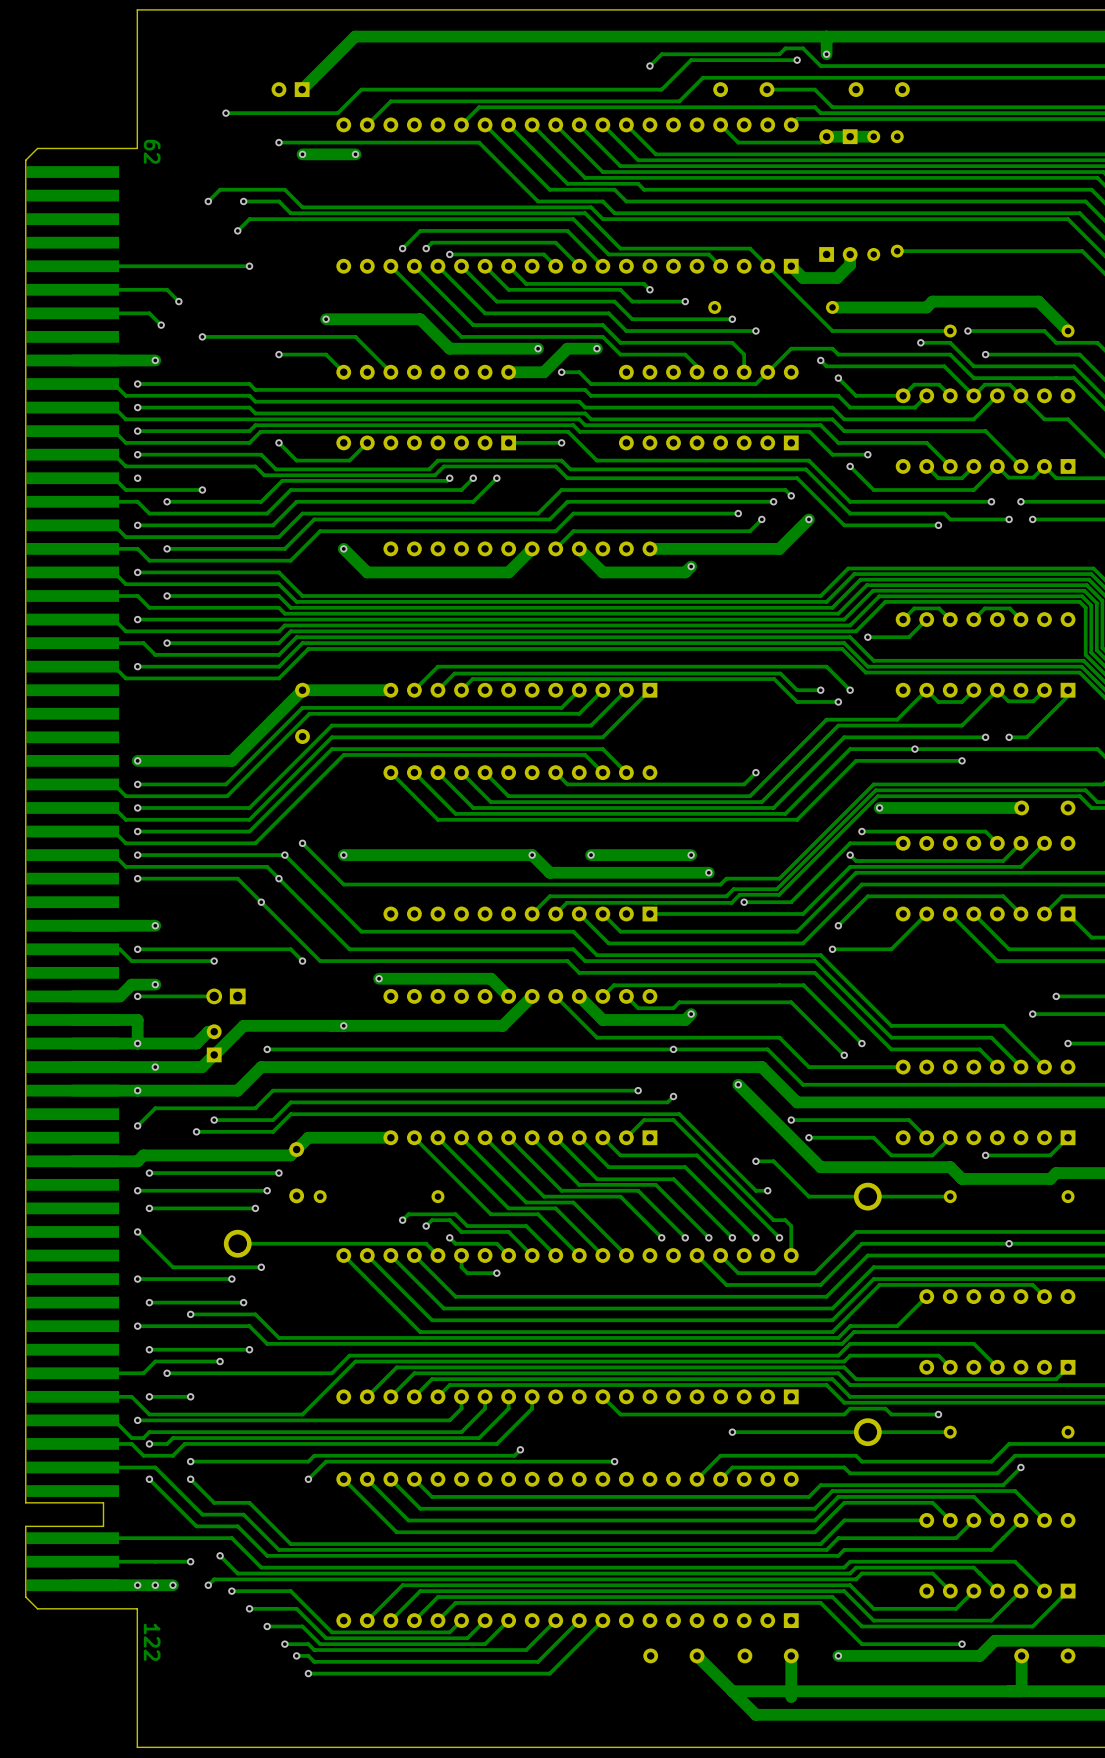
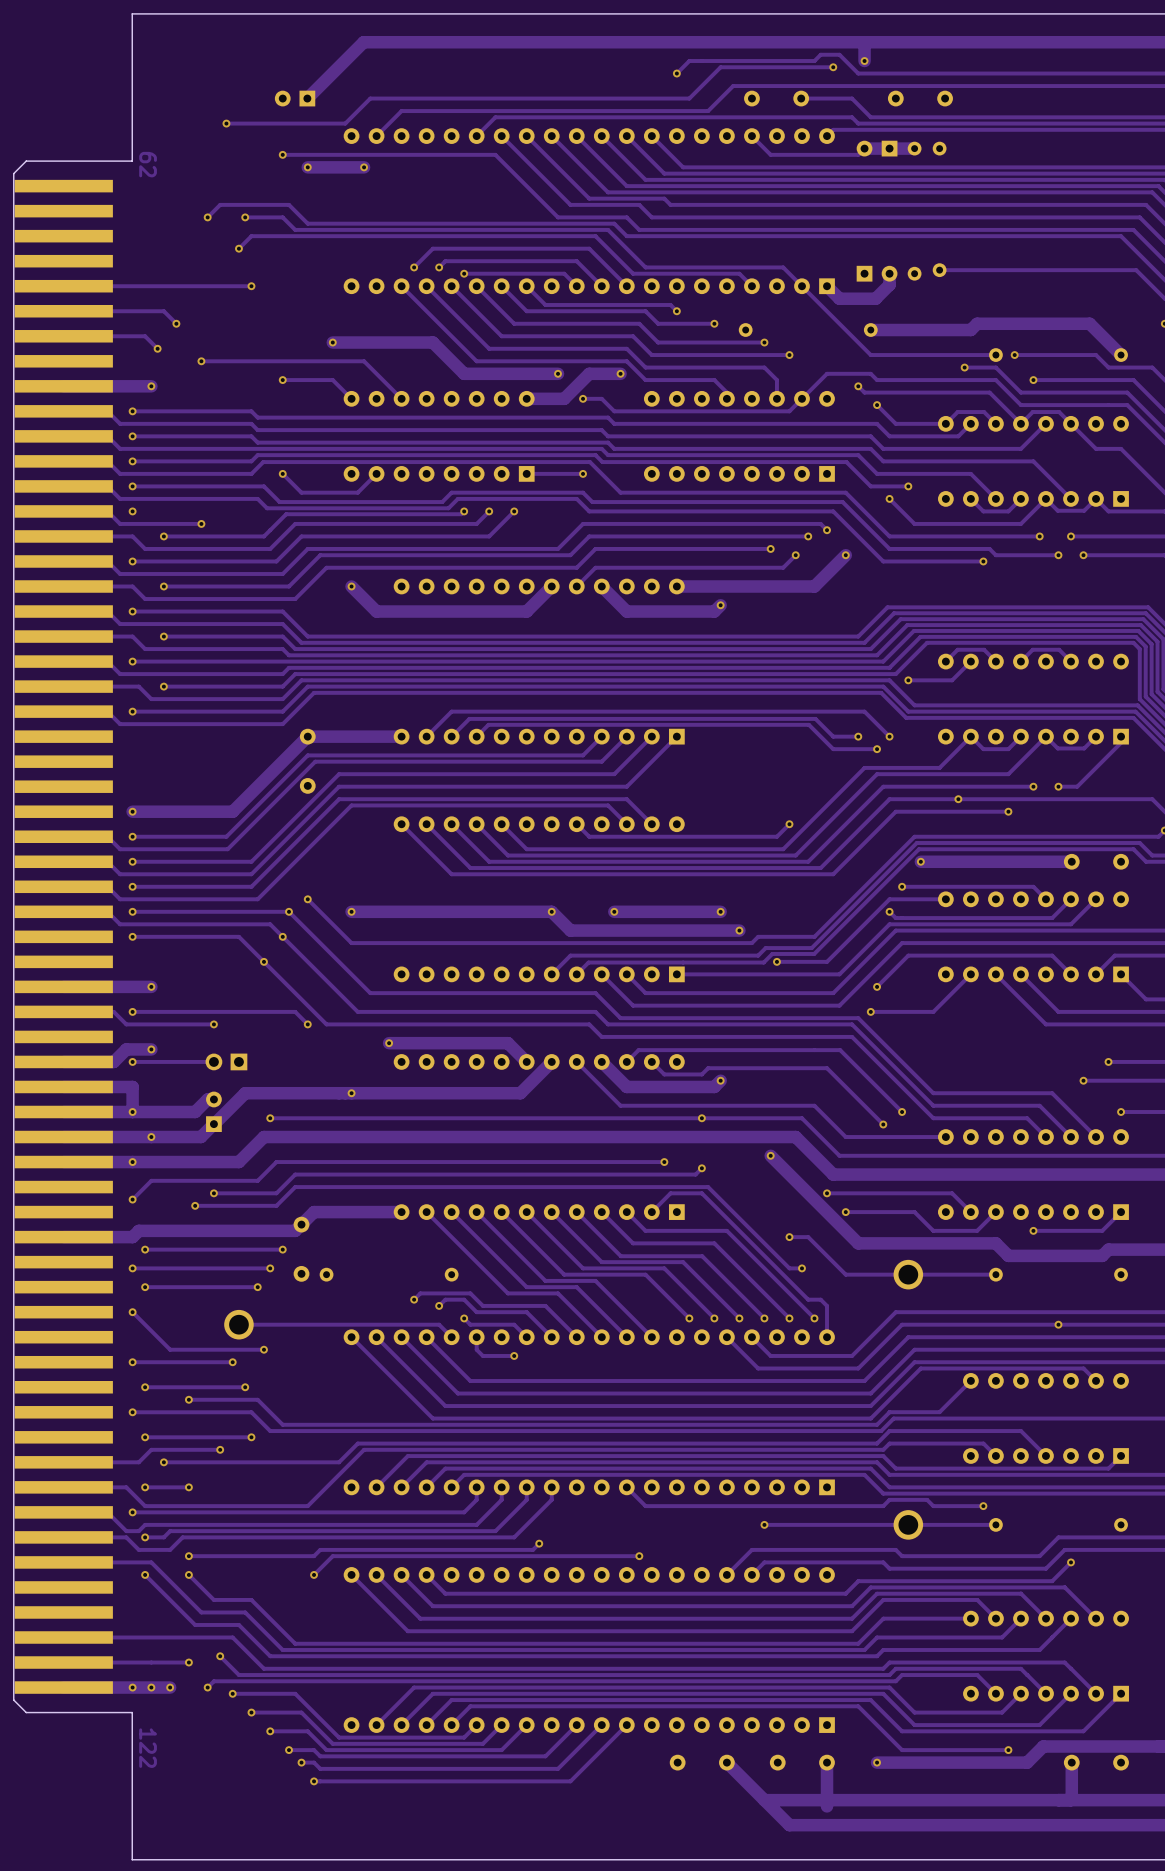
part footprint: [25, 147, 138, 1610] -> [13, 160, 133, 1714]

